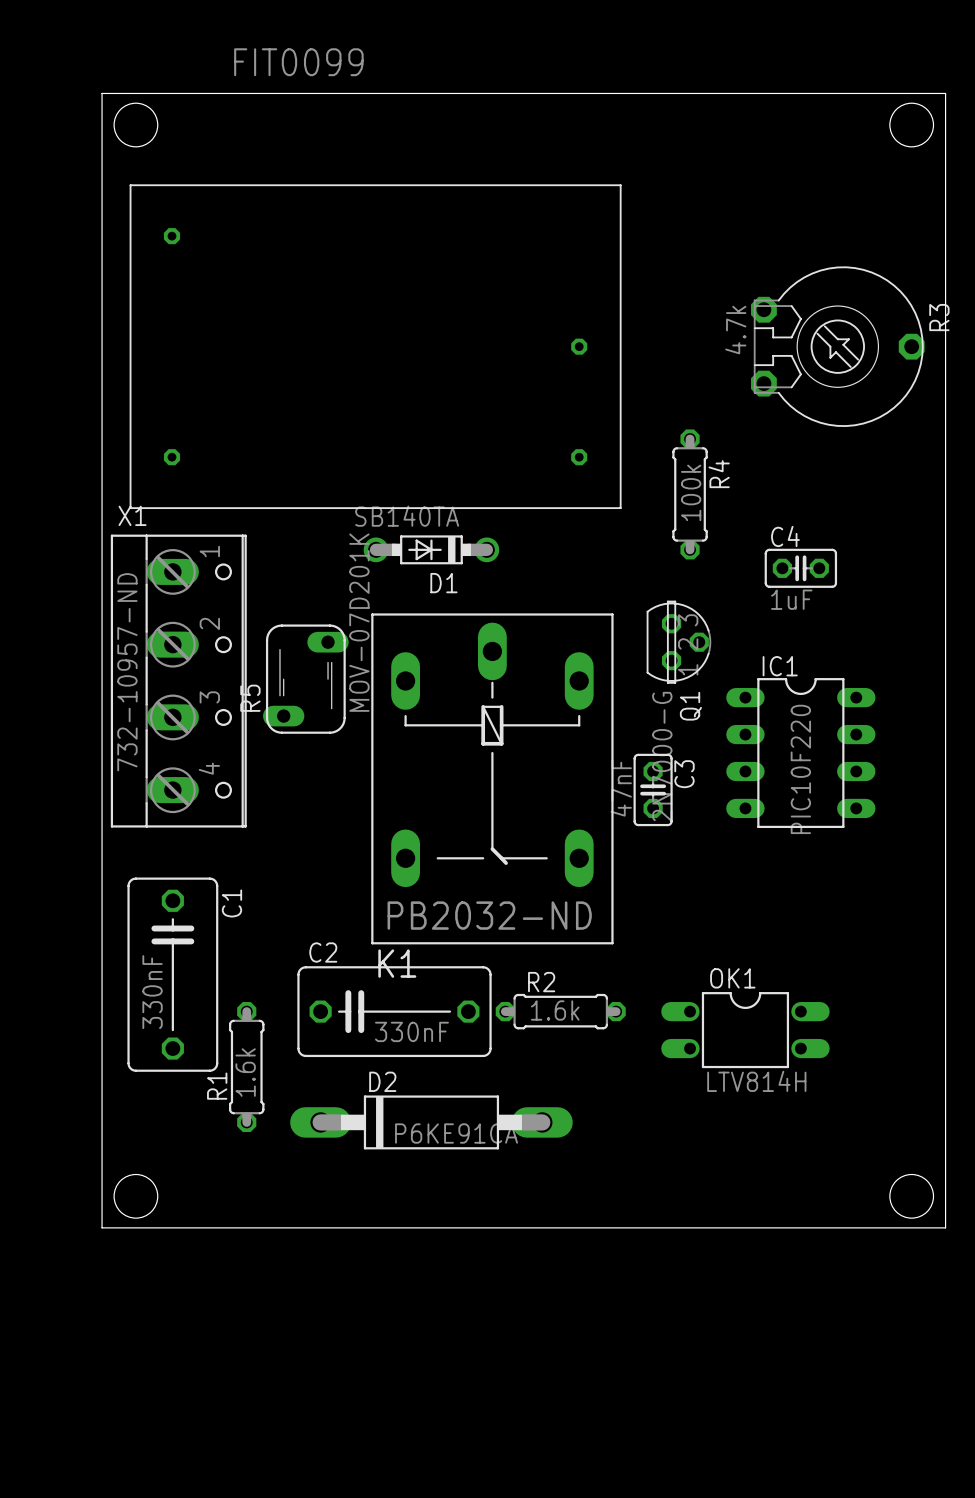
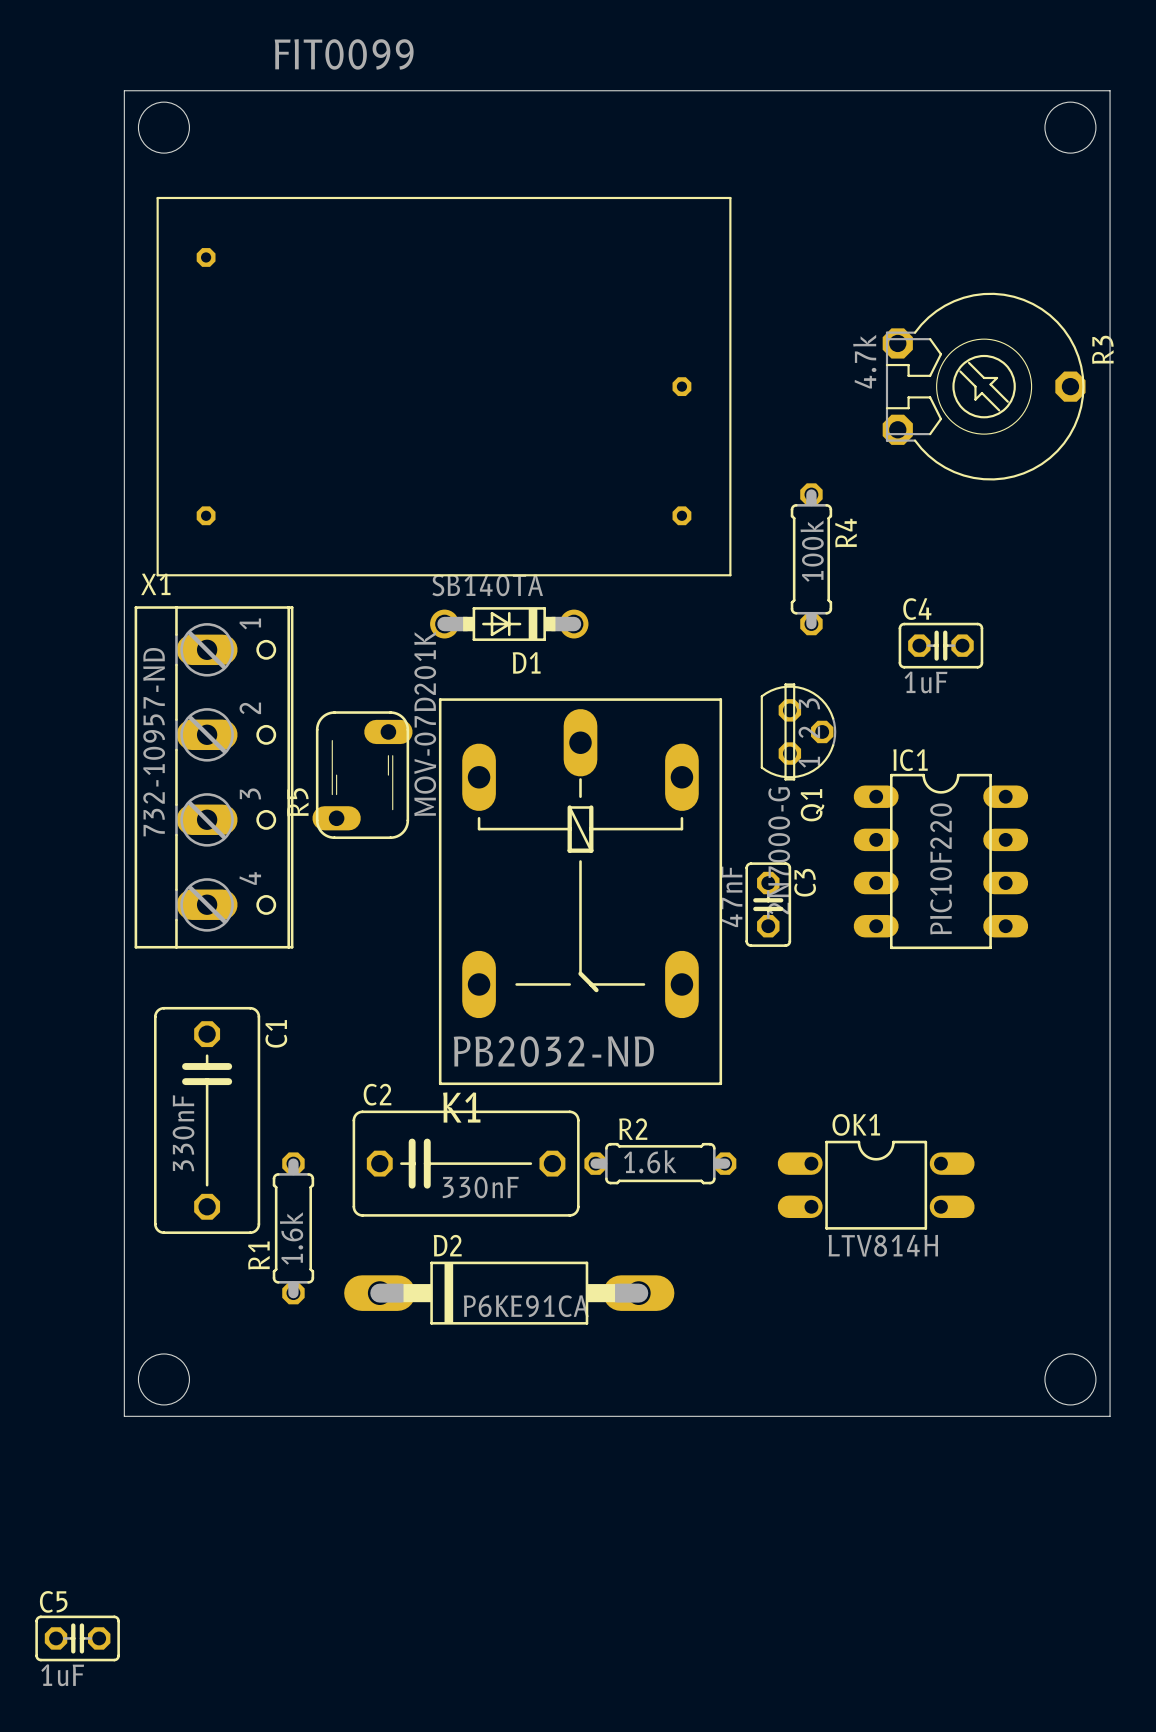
C5: none -> 1uF (77, 1638)

